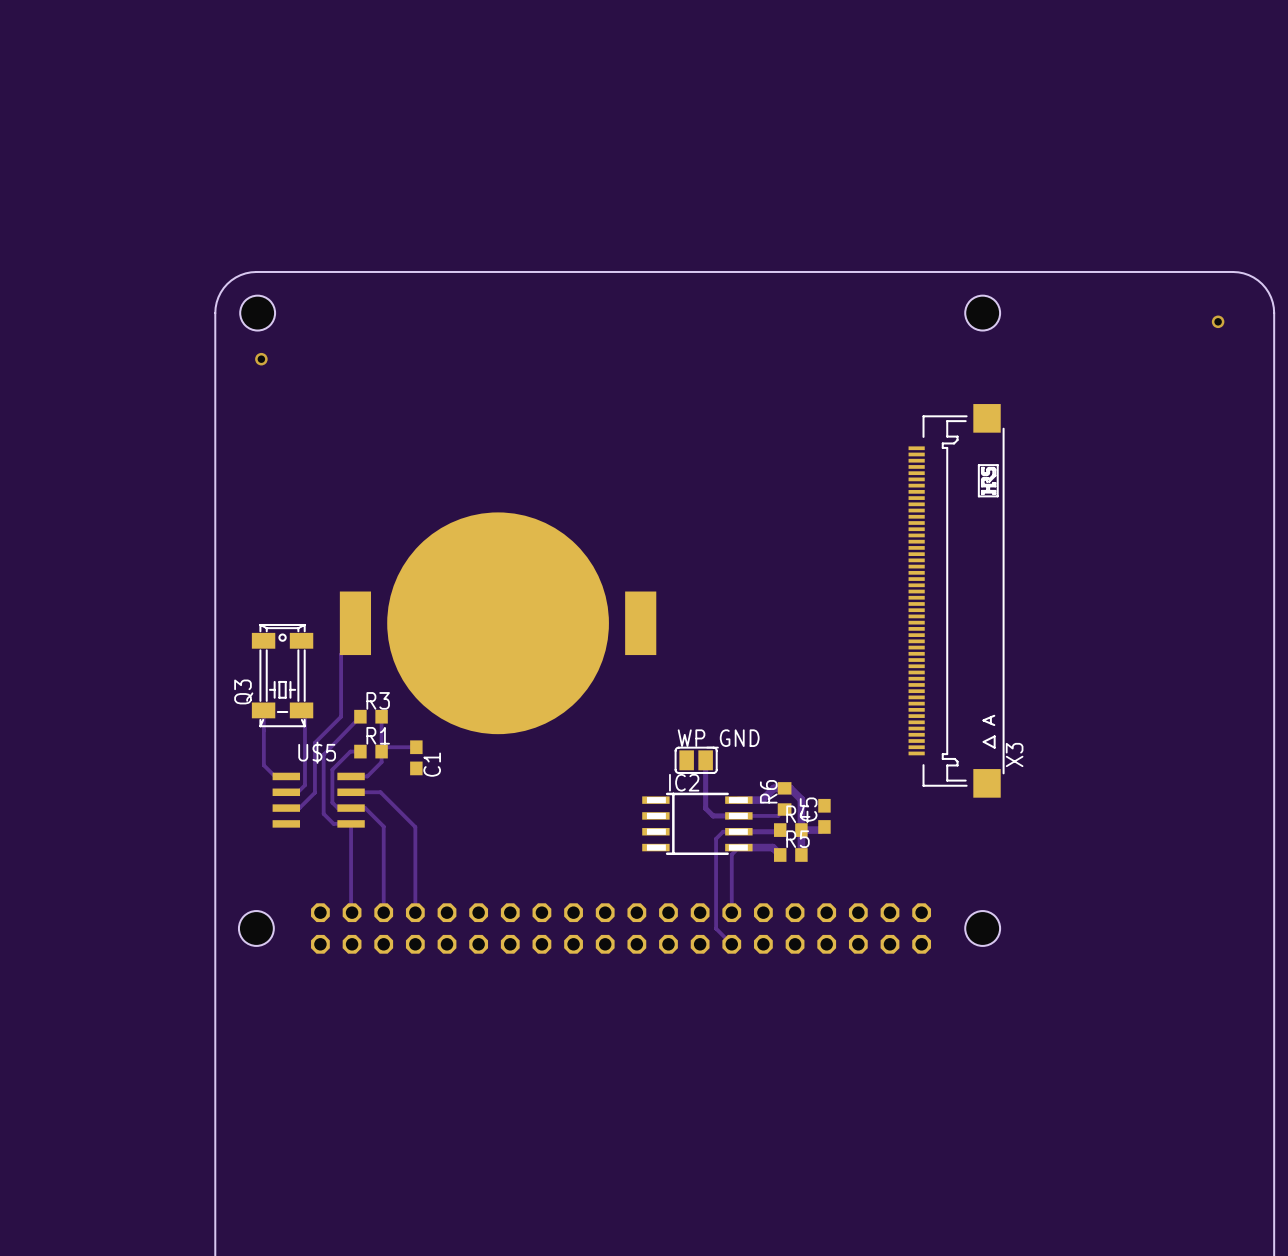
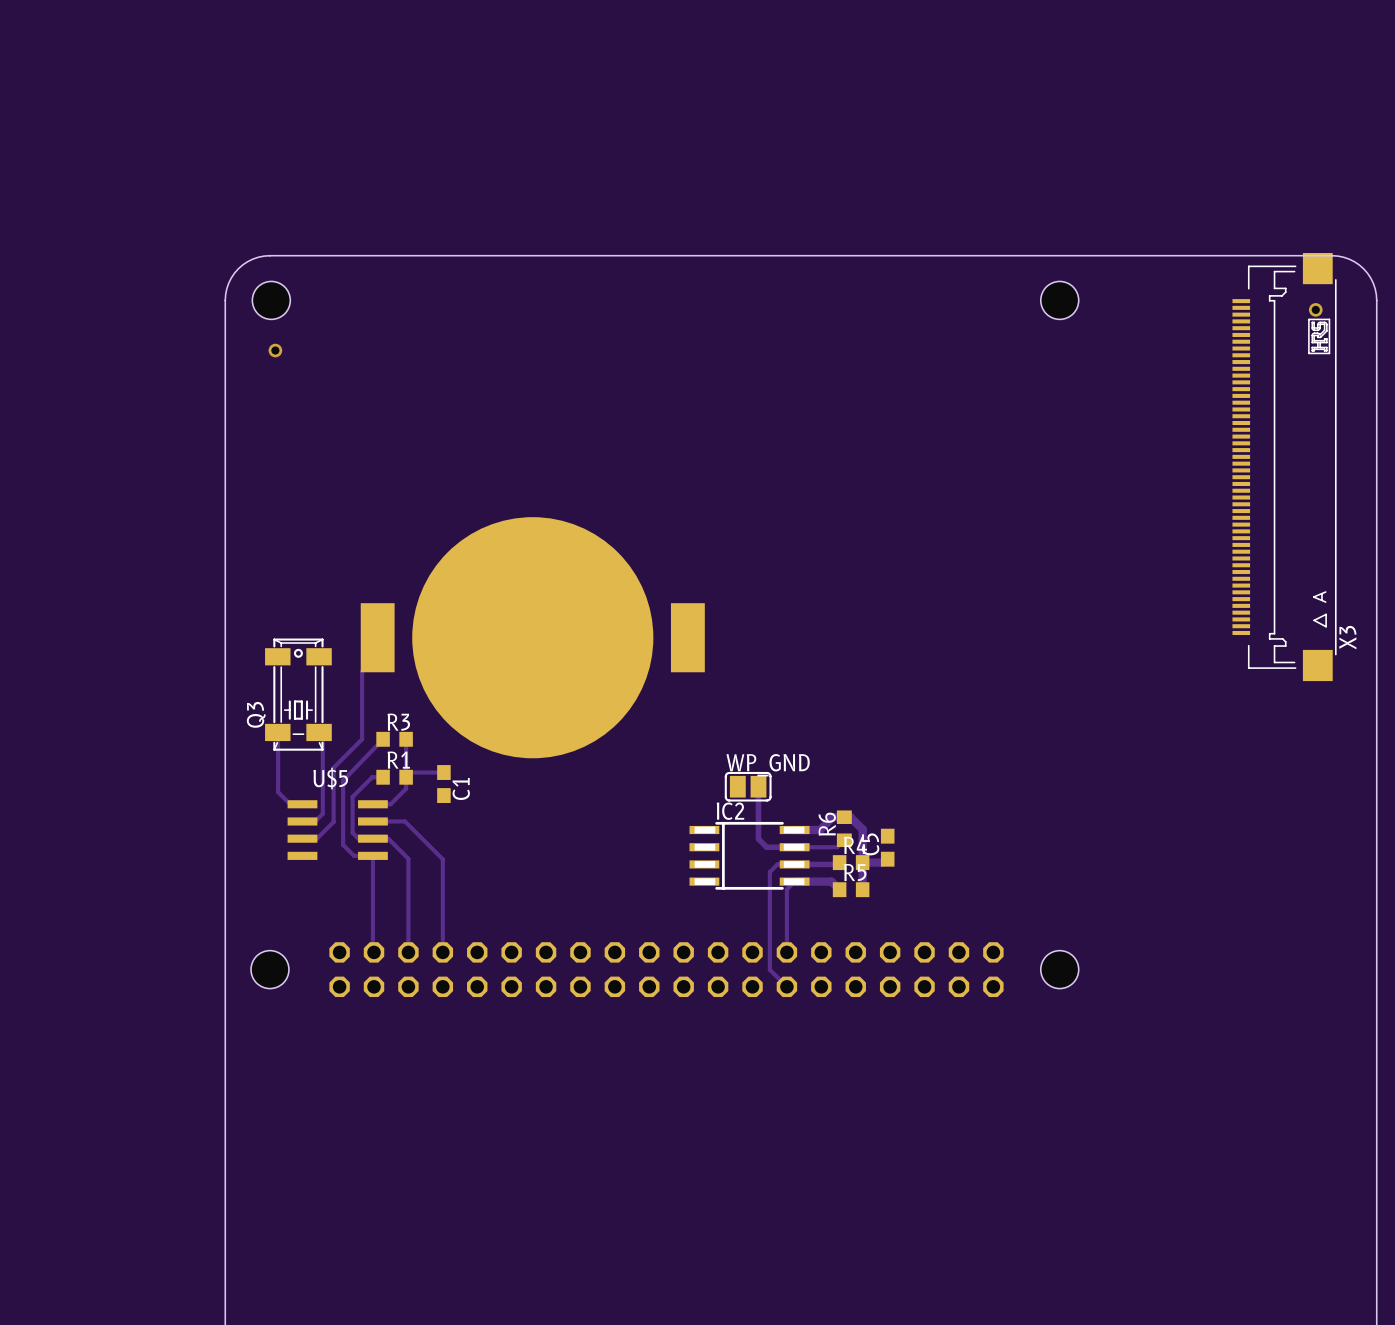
X3 position: (956, 600) -> (1284, 467)

